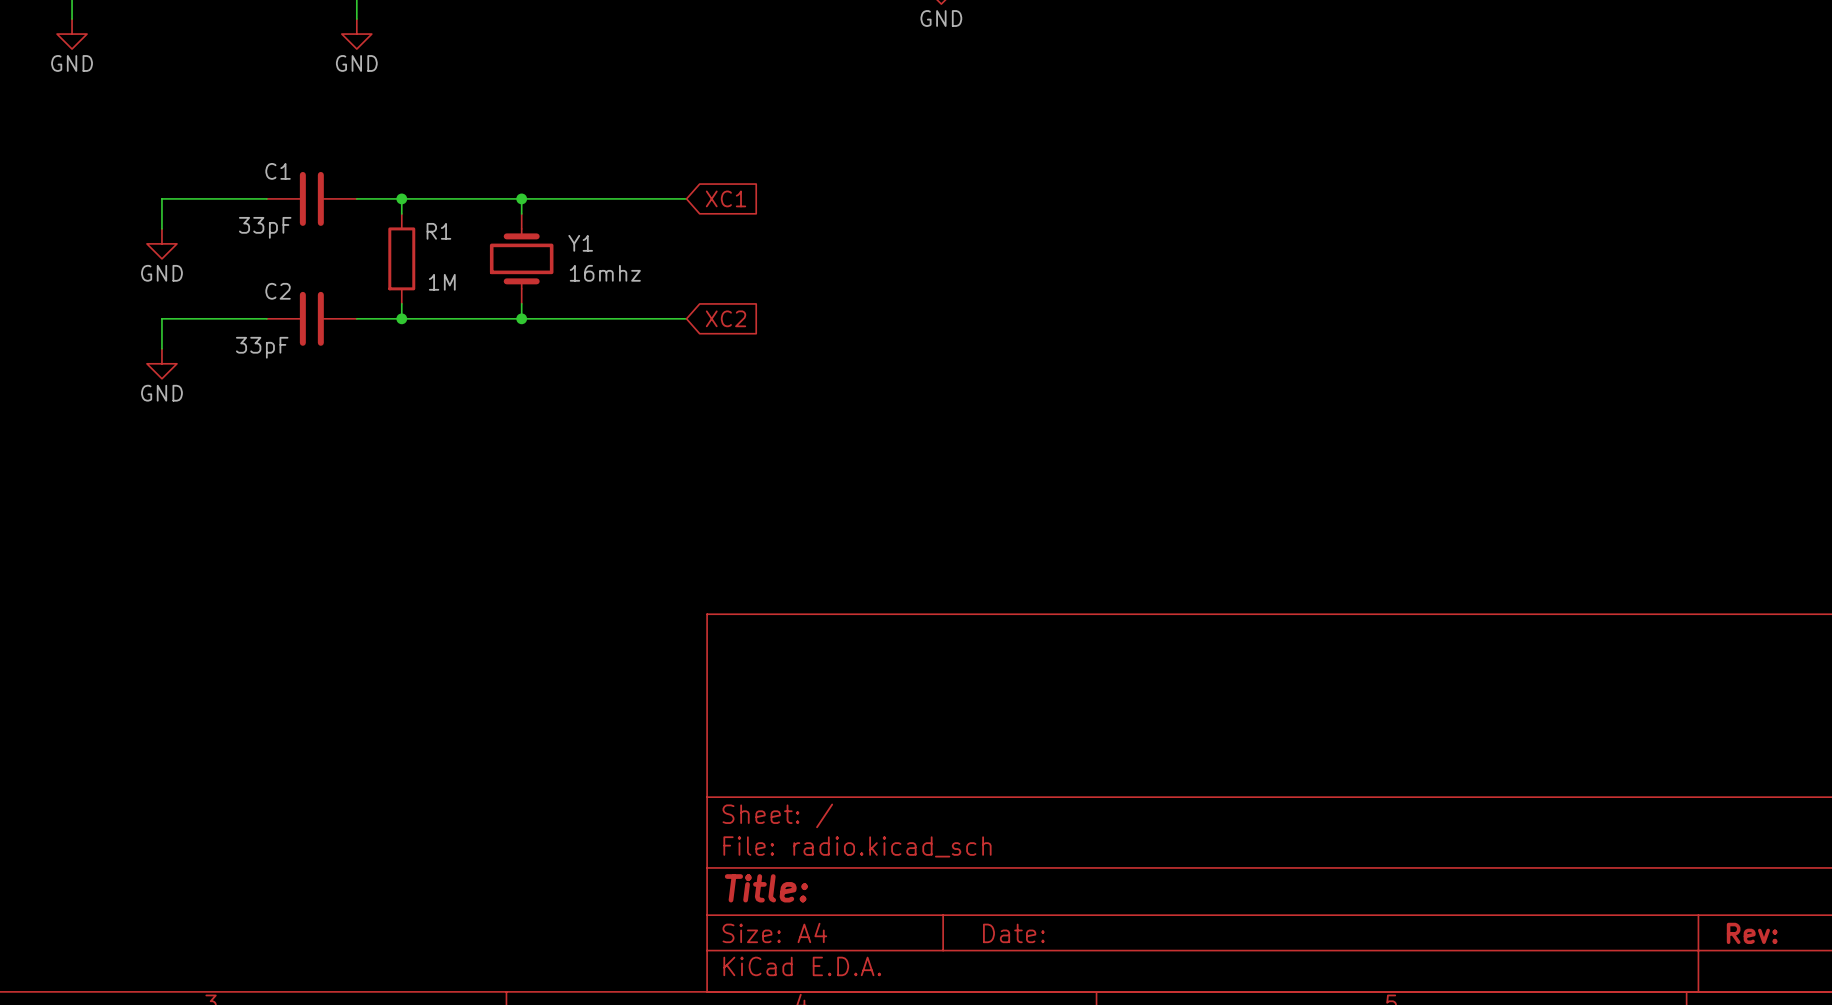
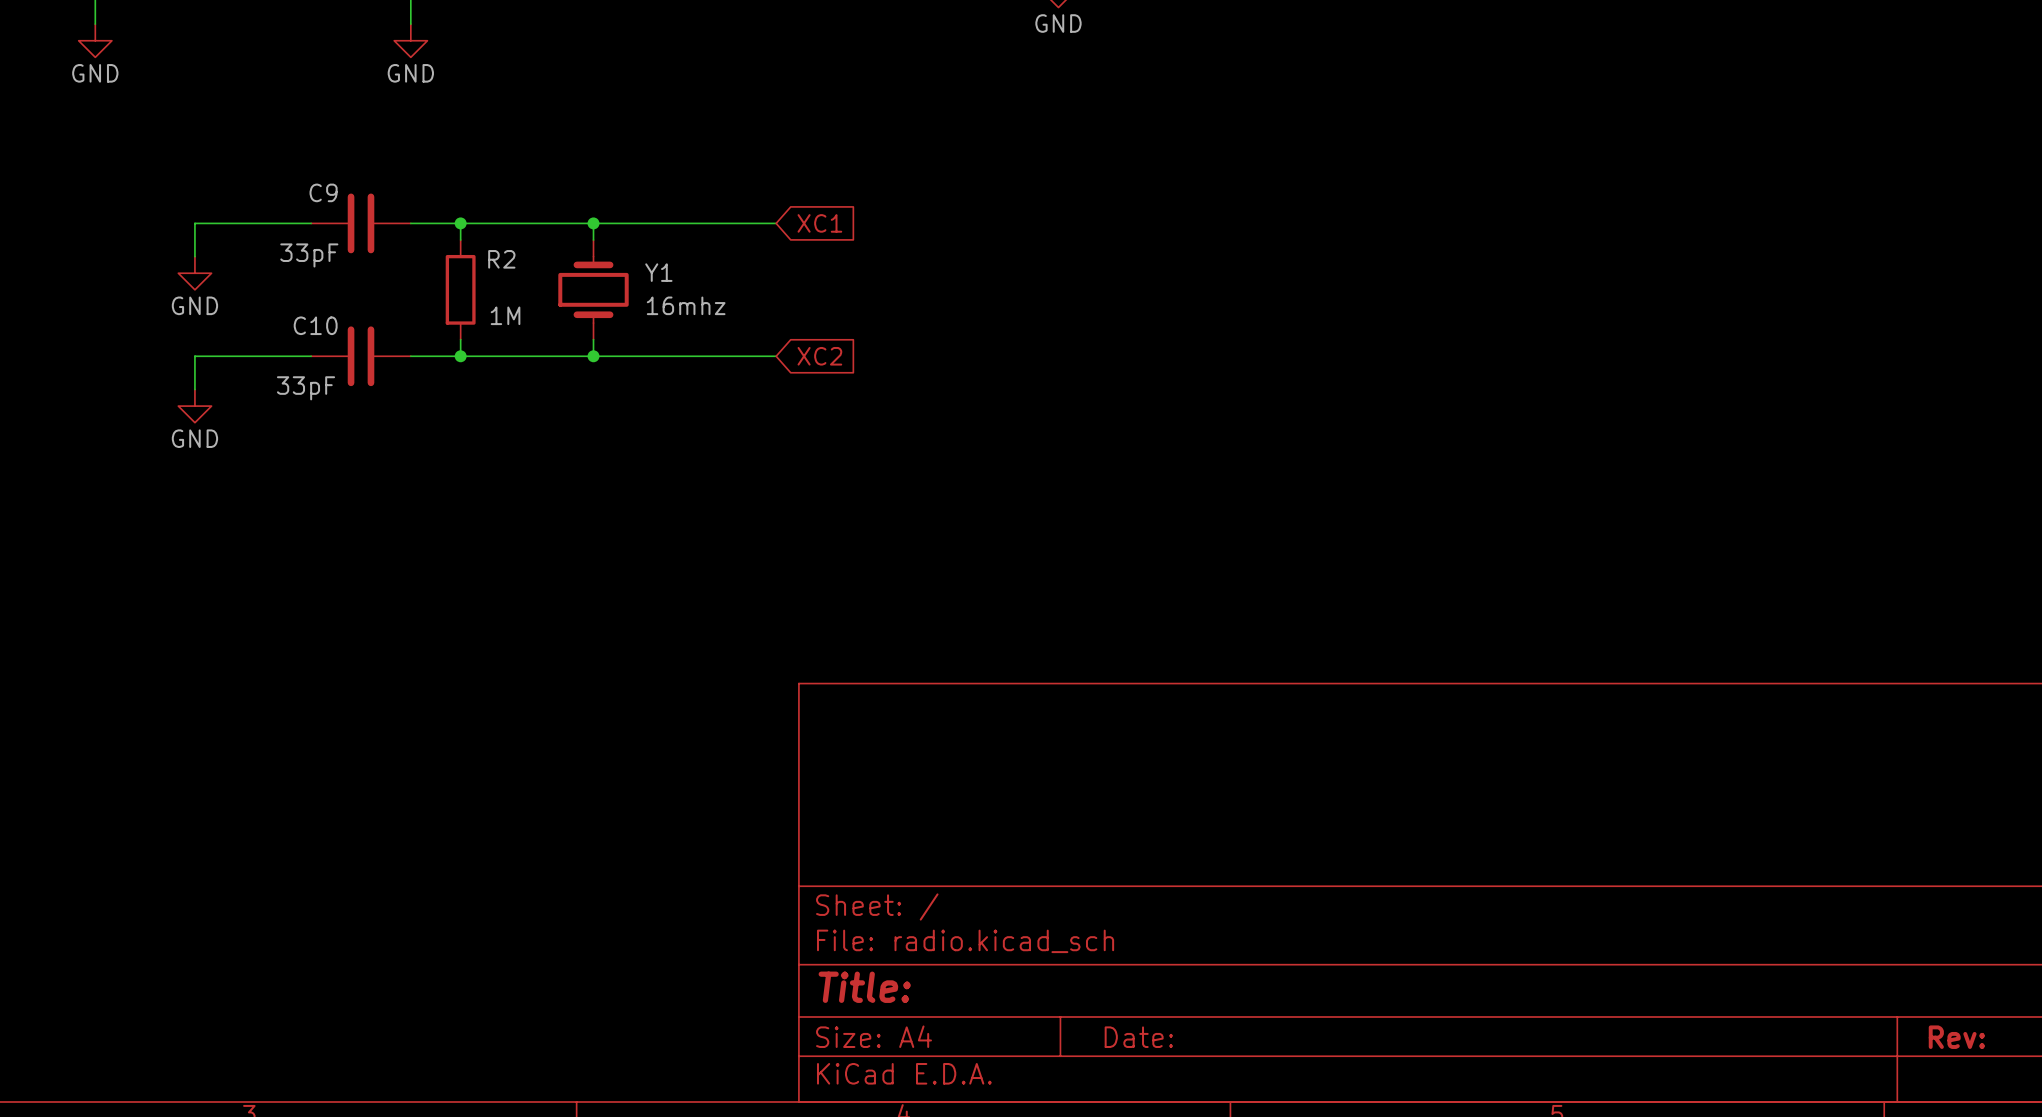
C1 name: C1 (278, 171) -> C9 (323, 192)
R1 name: R1 (438, 231) -> R2 (501, 259)
C2 name: C2 (278, 291) -> C10 (315, 325)

